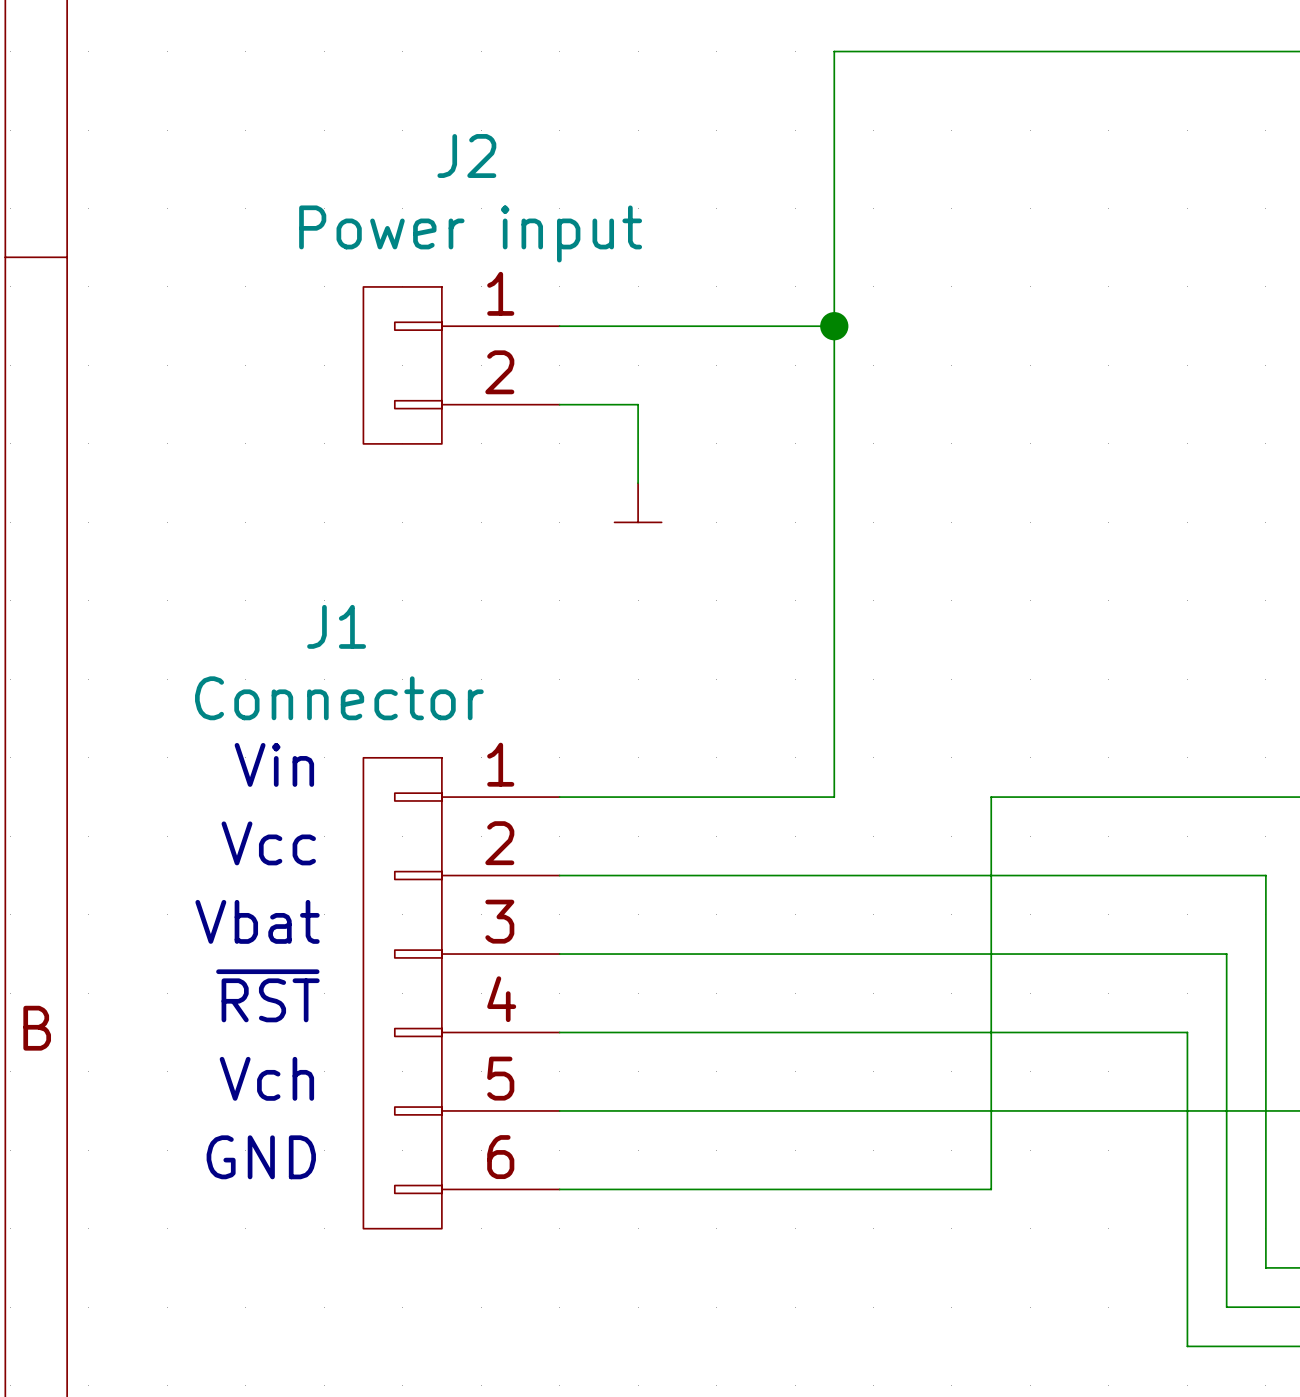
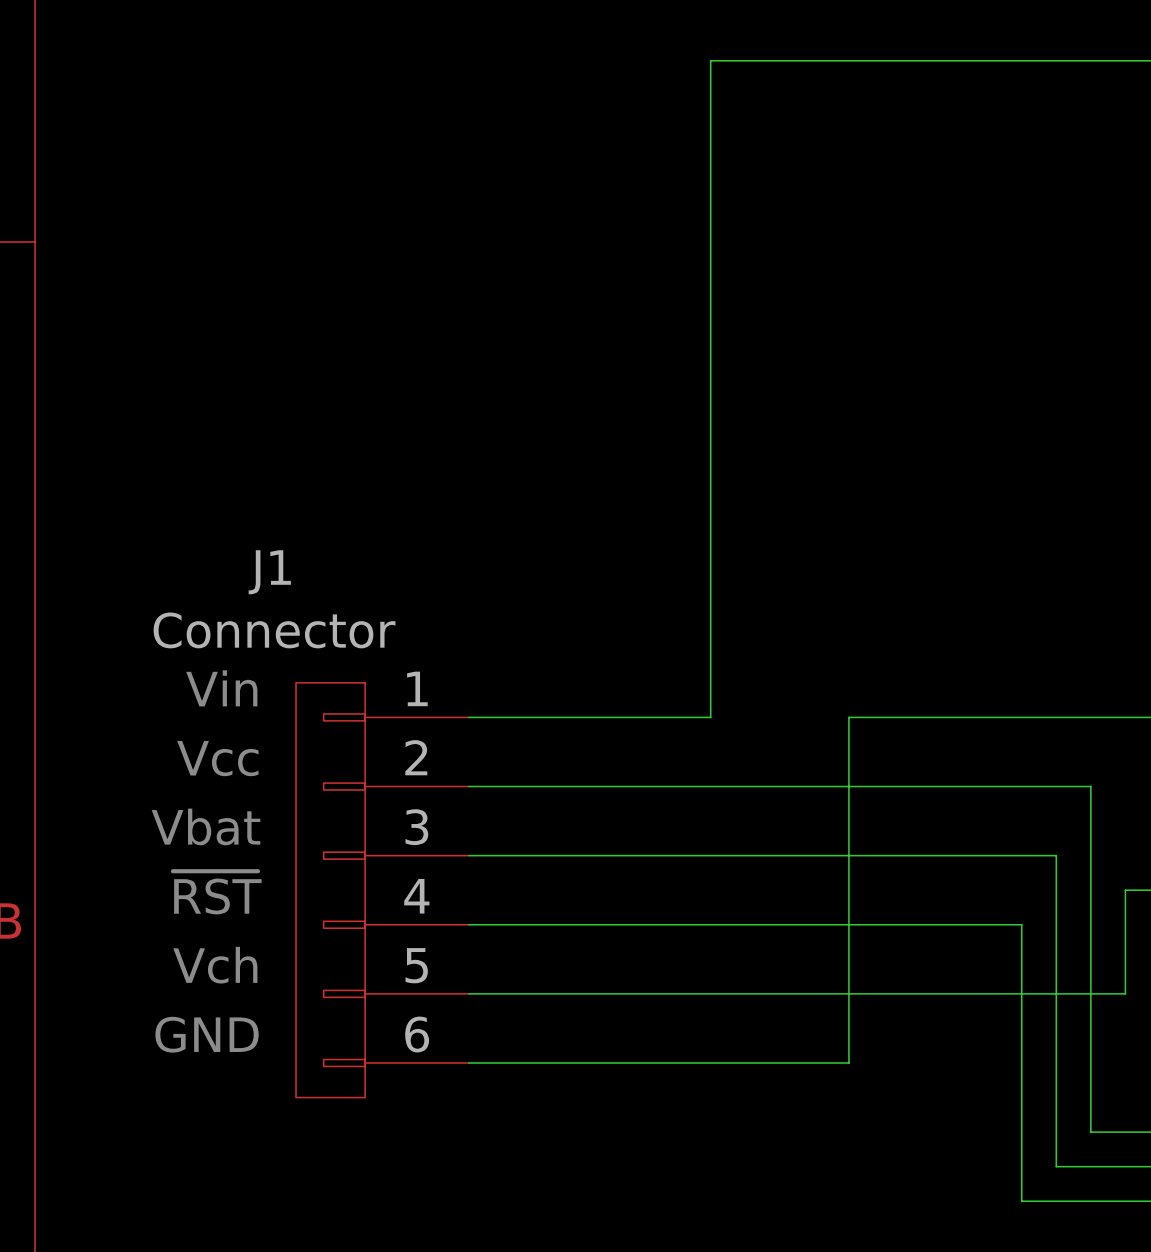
wire: (559, 326) (834, 326) -> none
junction: (834, 326) -> none
J2: Power input (461, 365) -> none
wire: (559, 404) (638, 404) (638, 483) -> none
power symbol: (638, 502) -> none

